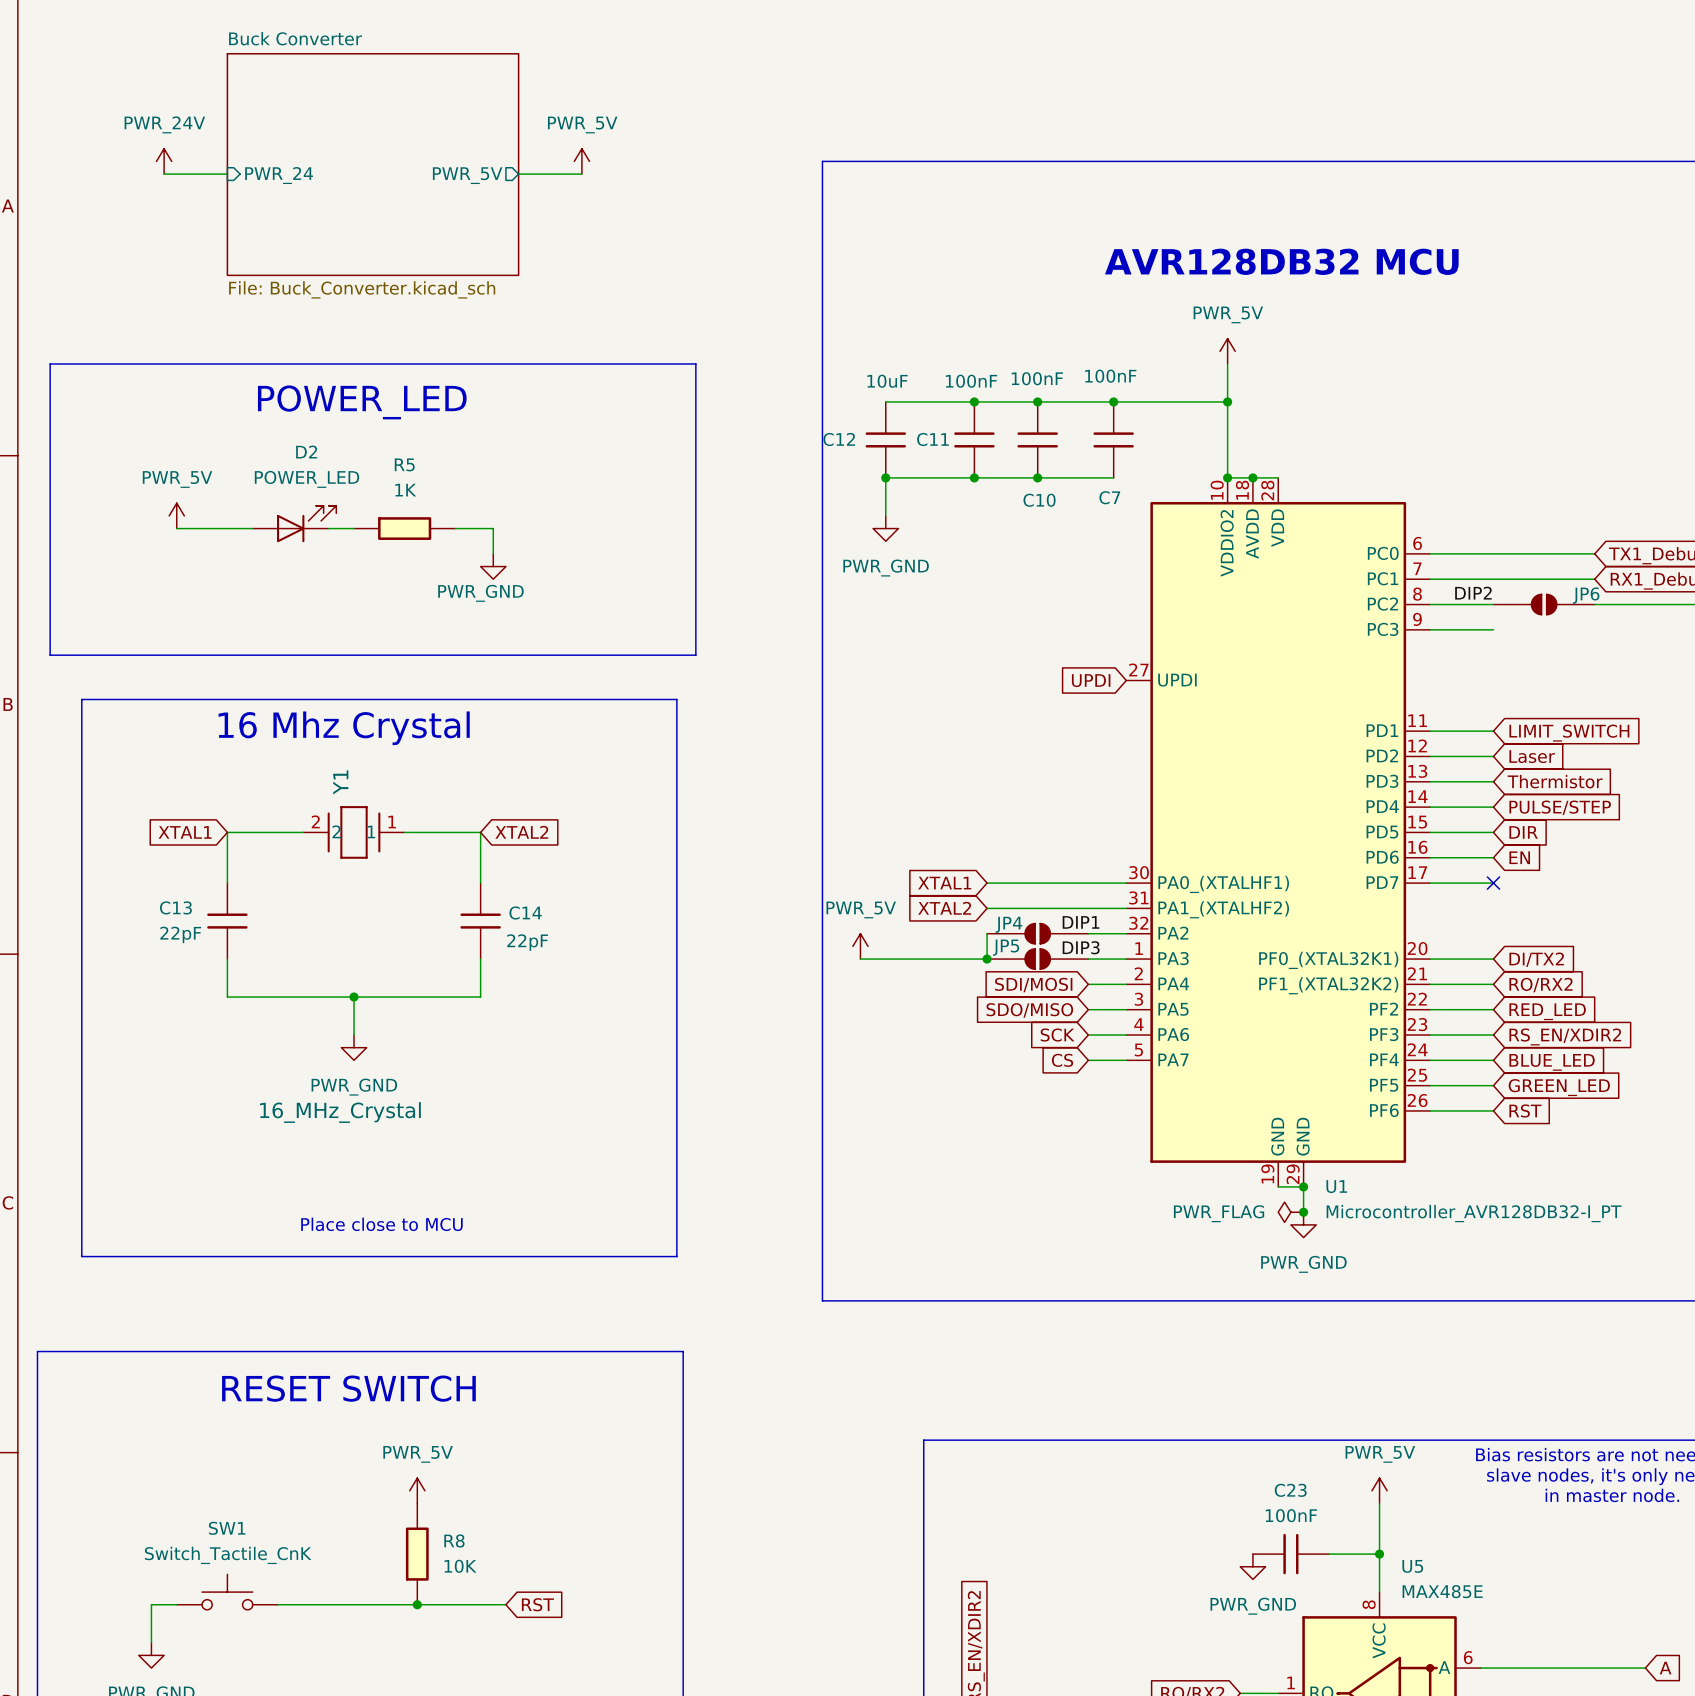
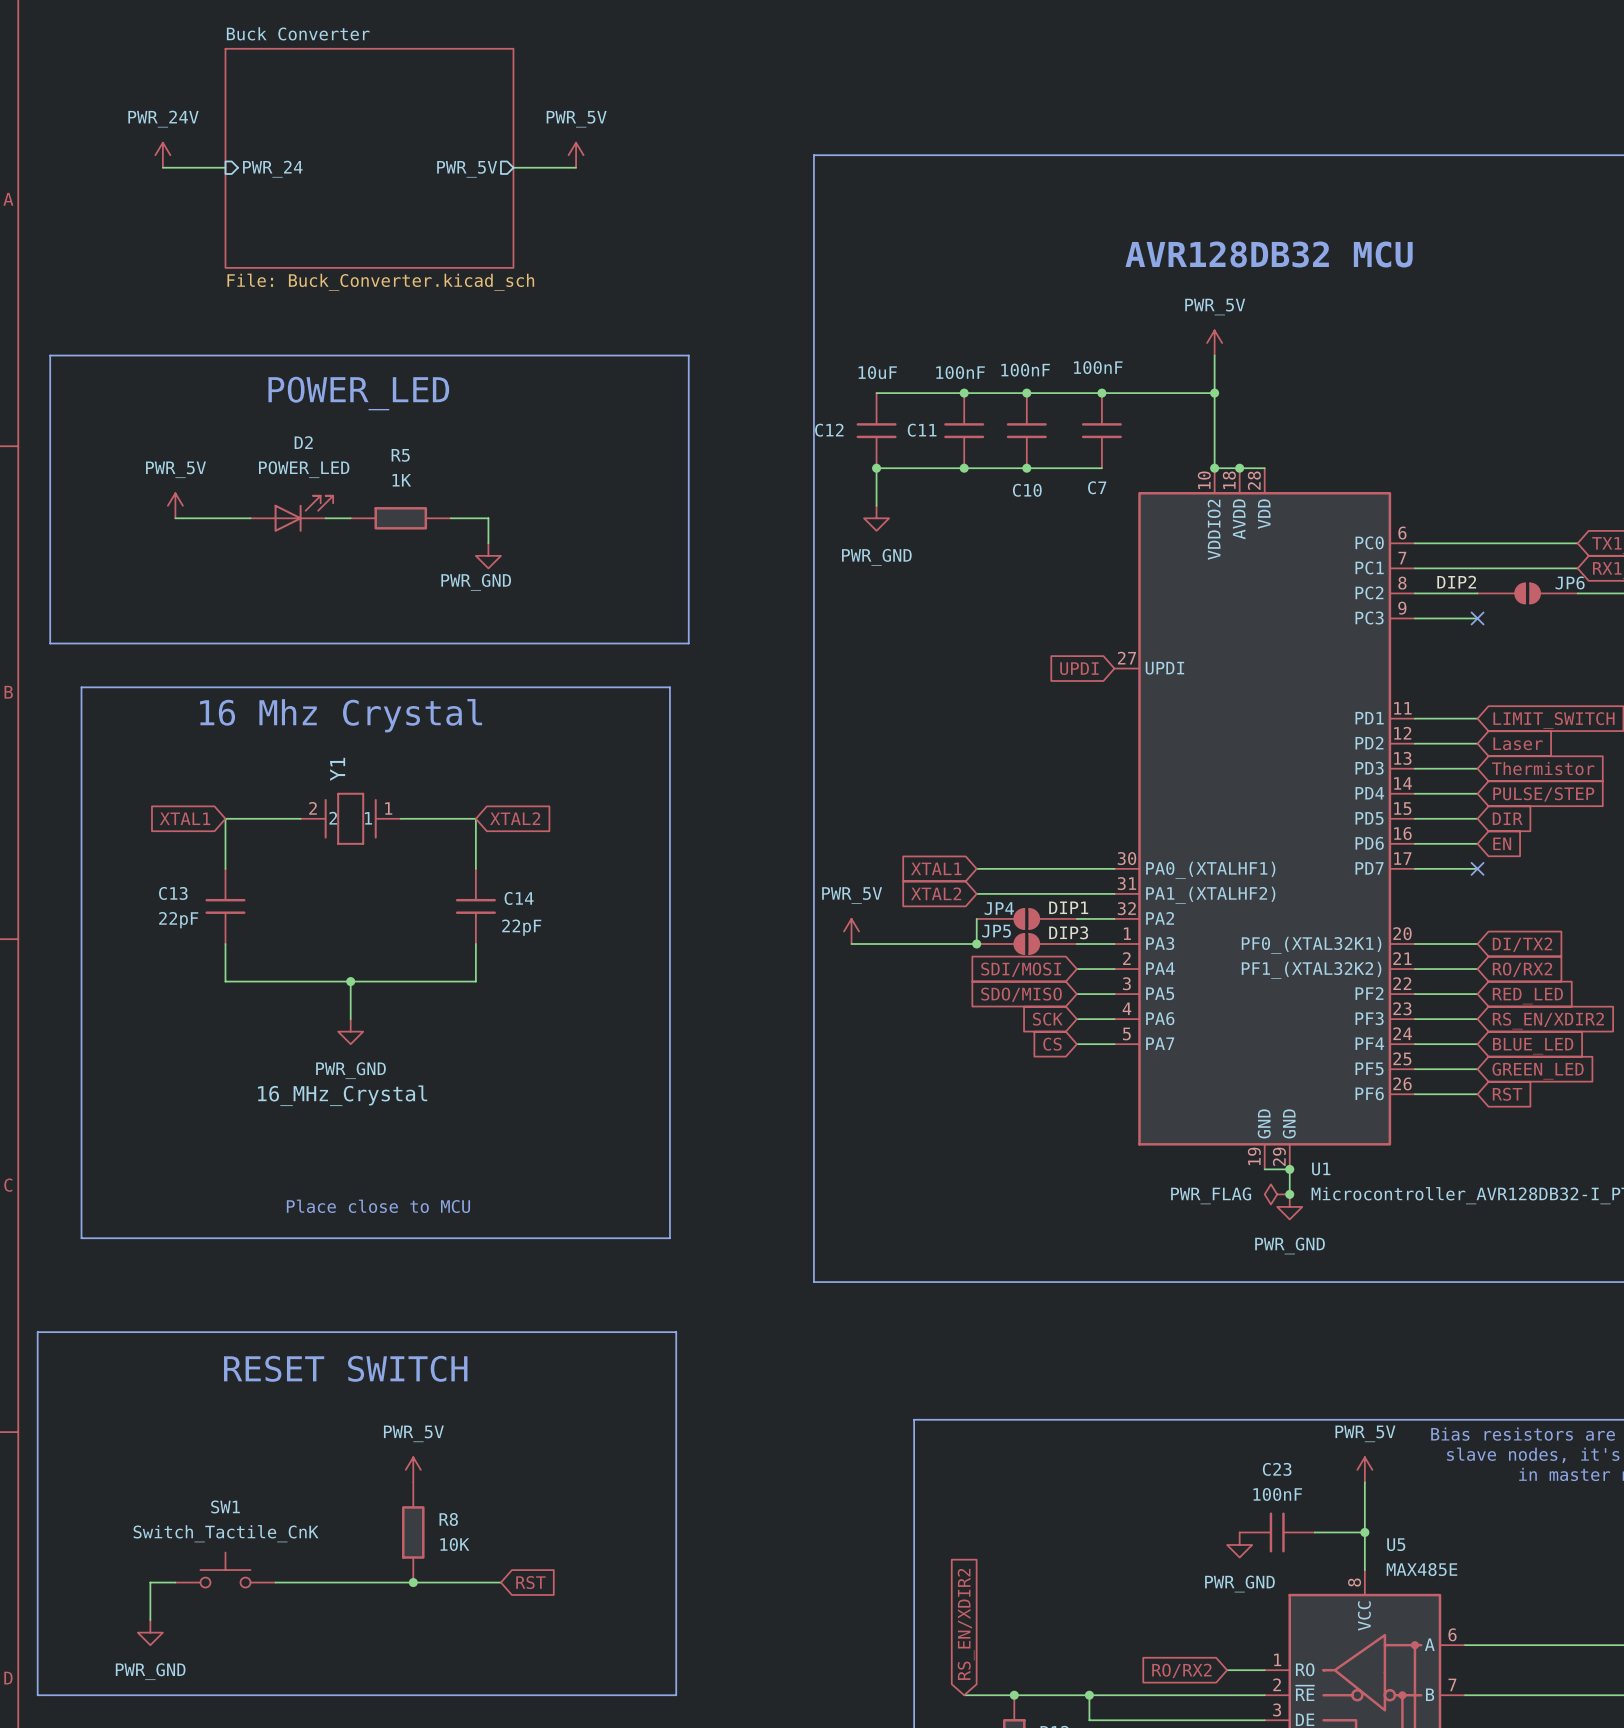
no-connect mark: none -> (1477, 618)

